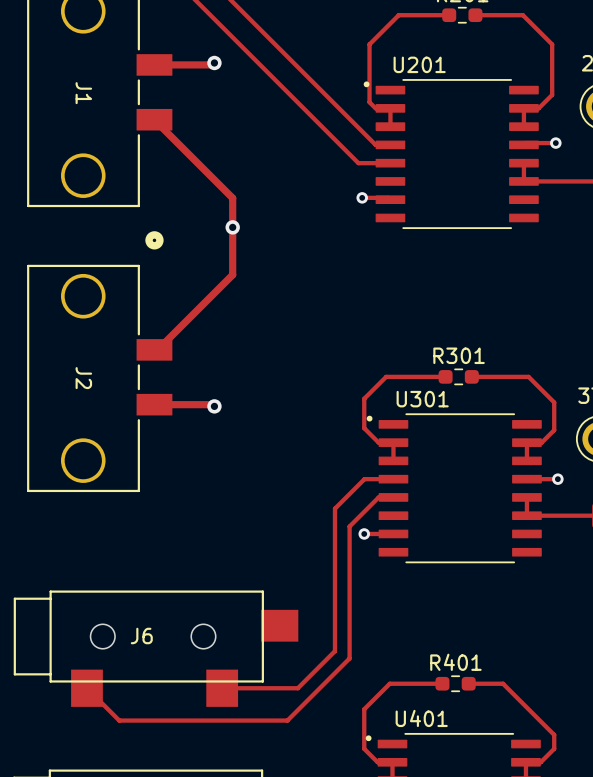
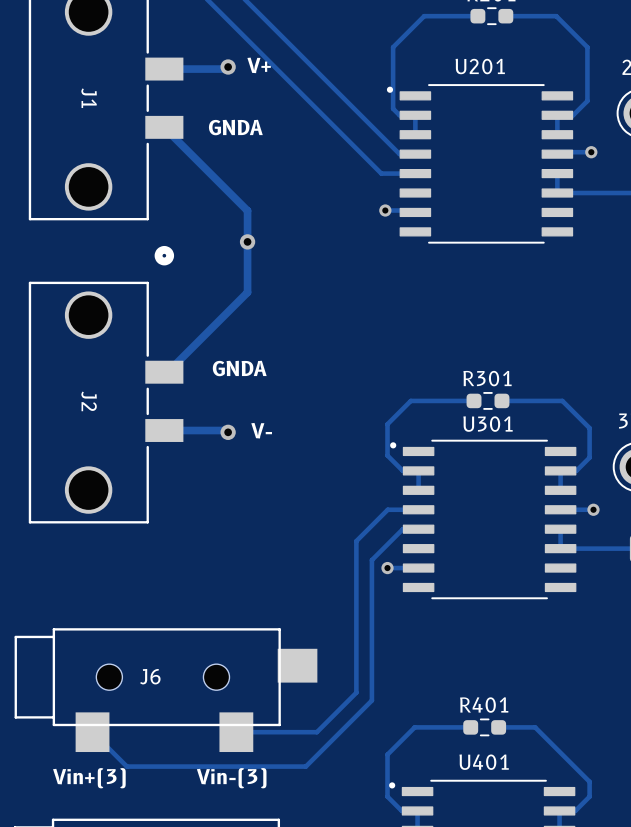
text: none -> V+ (259, 65)
U201 name position: U201 (419, 64) -> U201 (480, 66)
text: none -> GNDA (235, 127)
text: none -> GNDA (239, 368)
U301 name position: U301 (422, 399) -> U301 (488, 424)
text: none -> V- (261, 430)
U401 name position: U401 (421, 718) -> U401 (484, 762)
text: none -> Vin+(3) (89, 778)
text: none -> Vin-(3) (231, 778)

